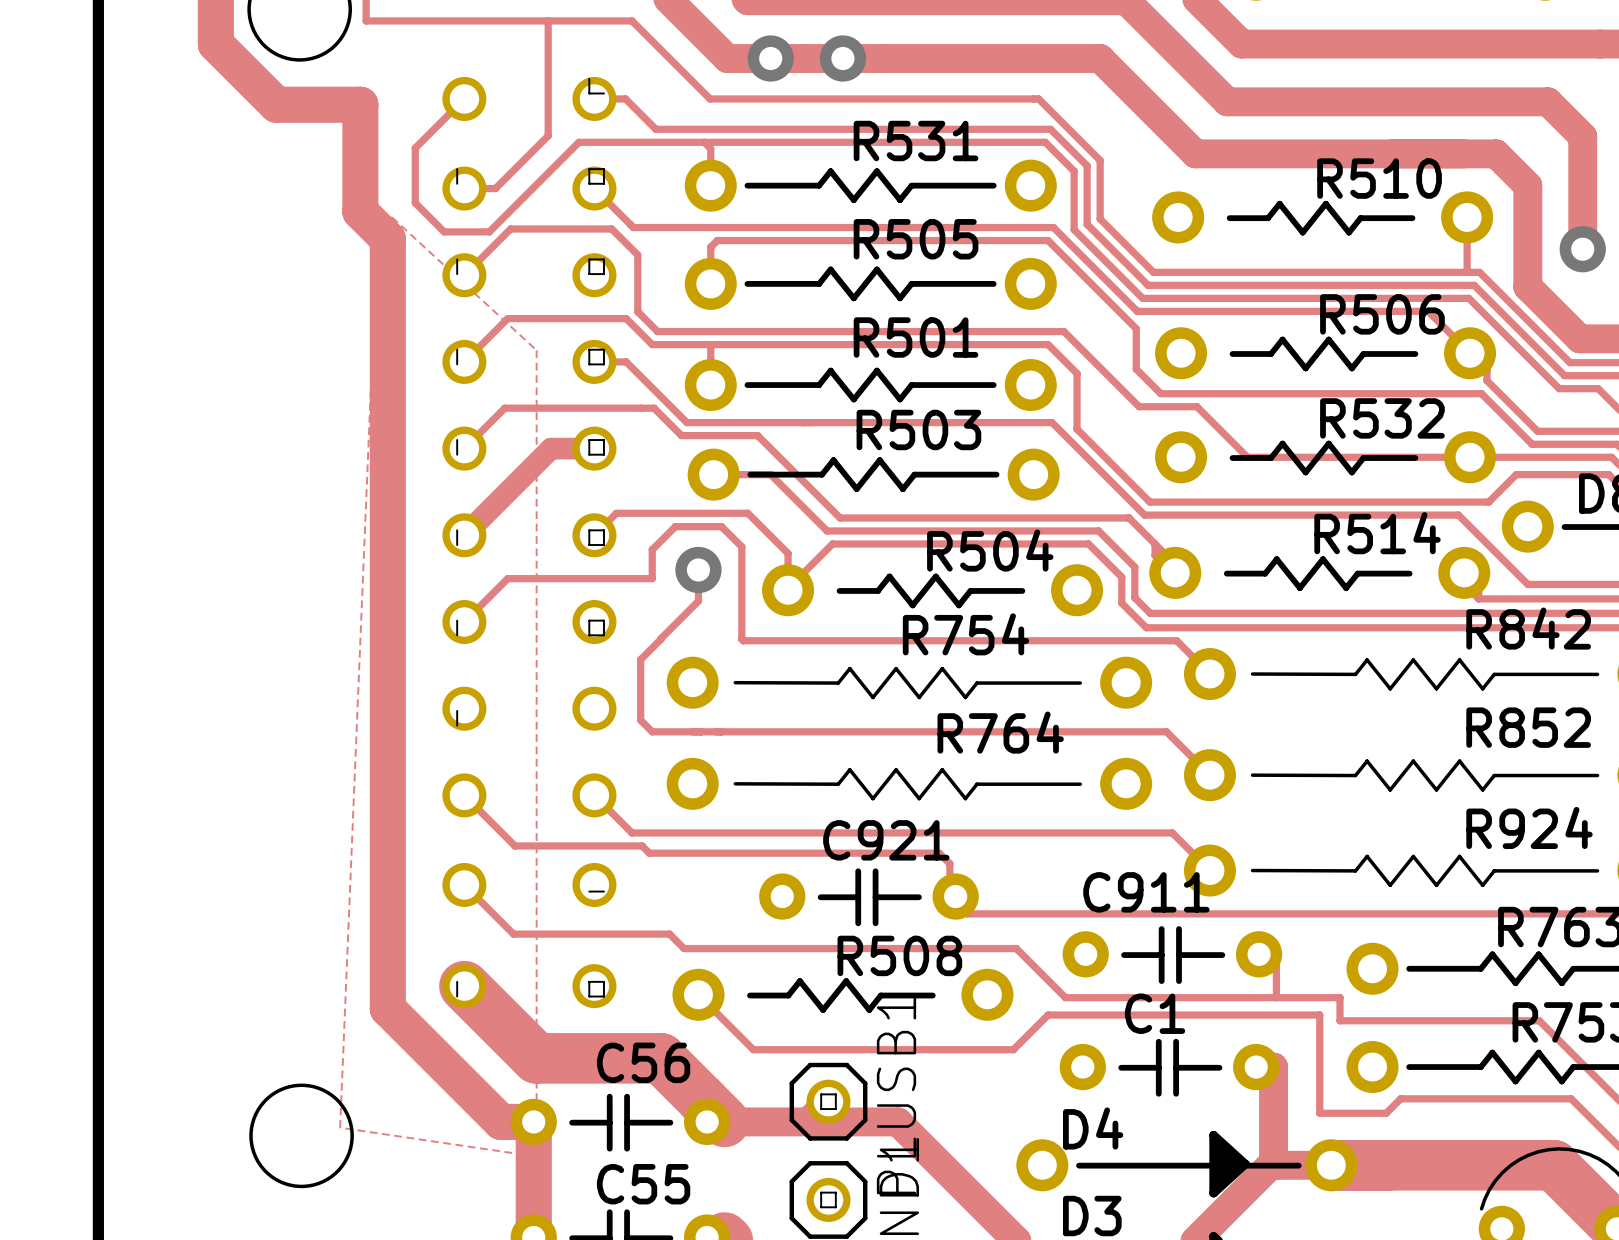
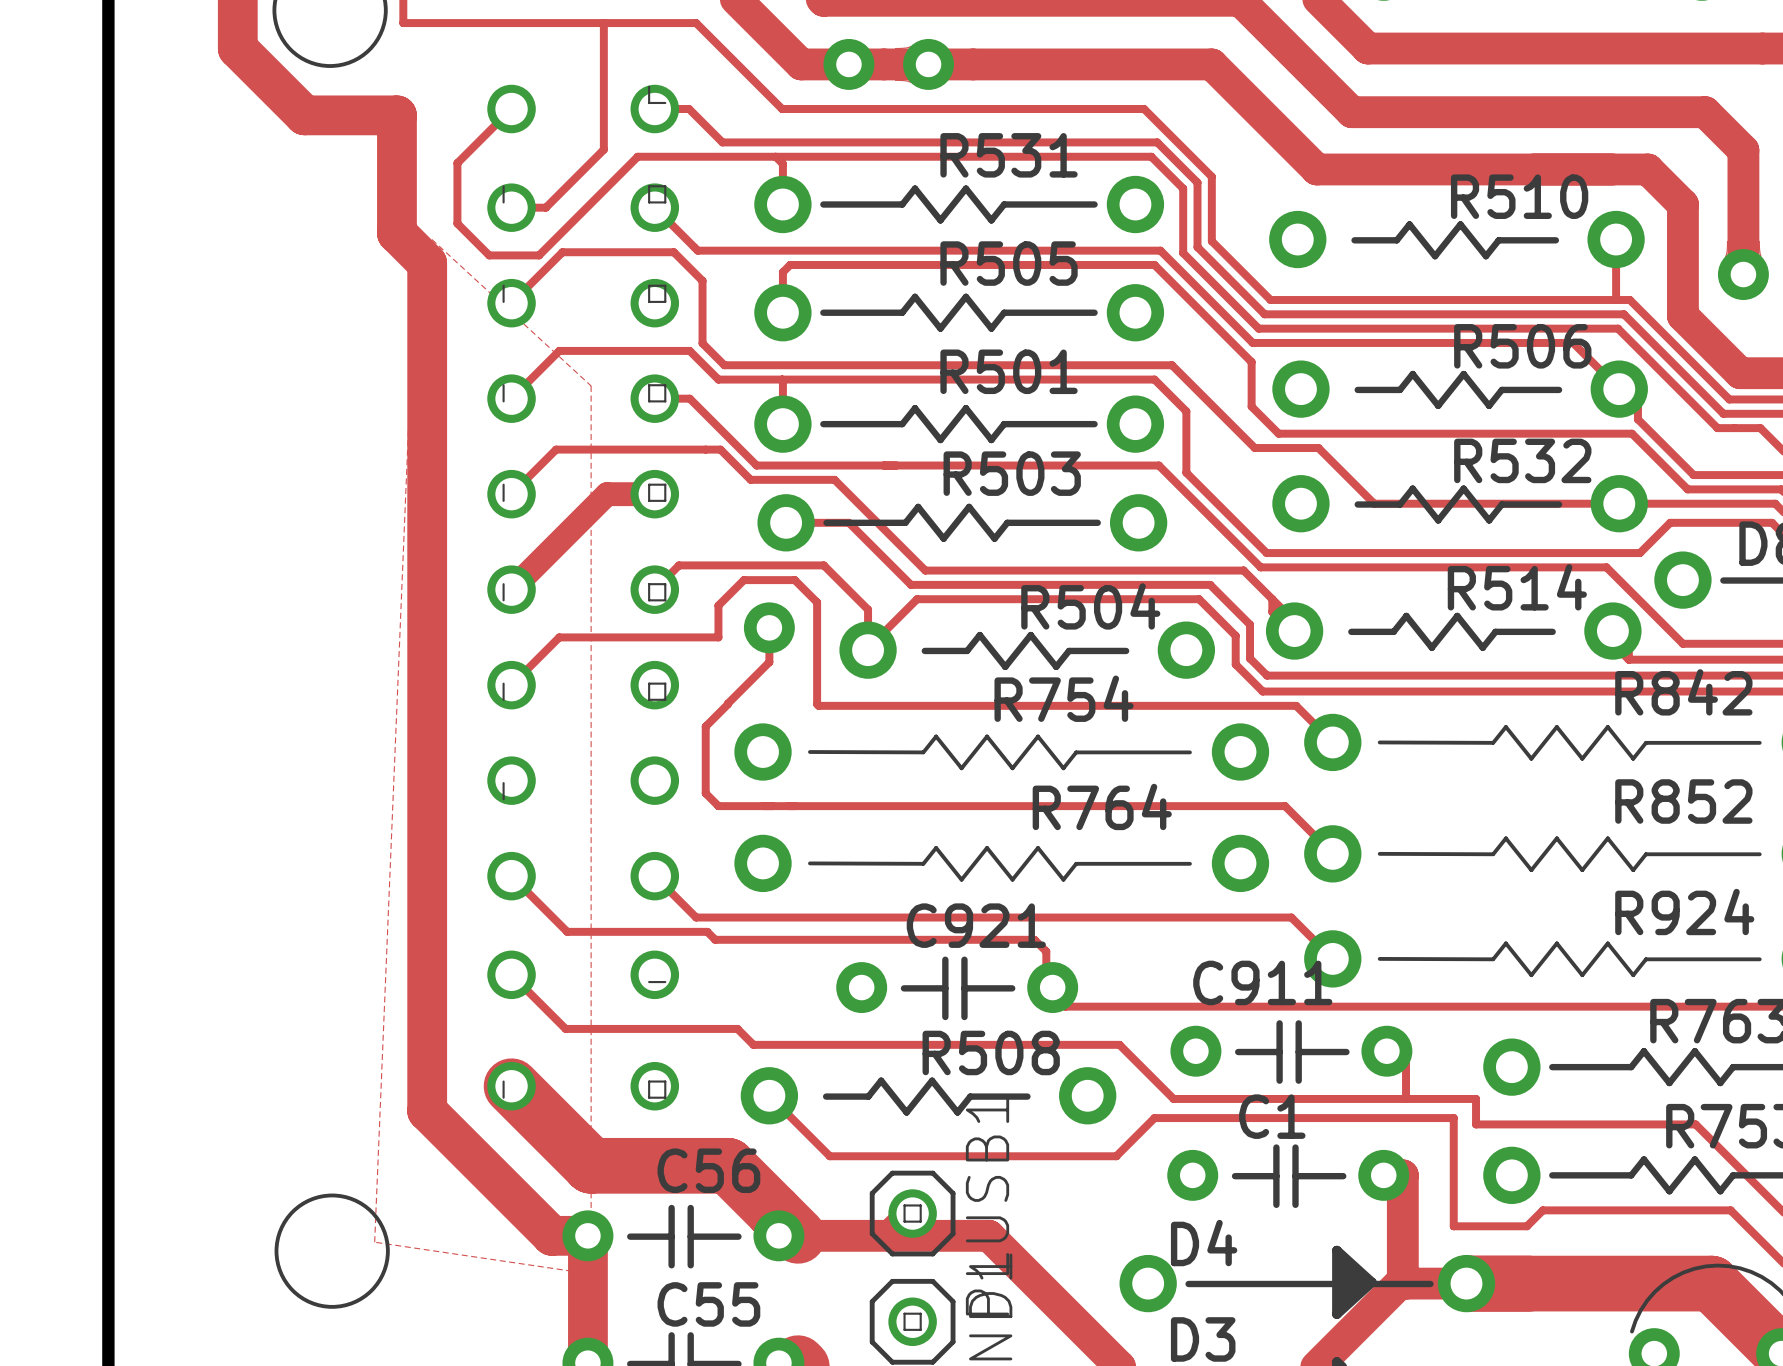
zone outline: none -> (909, 46) (895, 48) (895, 80) (909, 81)
zone outline: none -> (1725, 255) (1727, 241) (1759, 241) (1760, 255)

